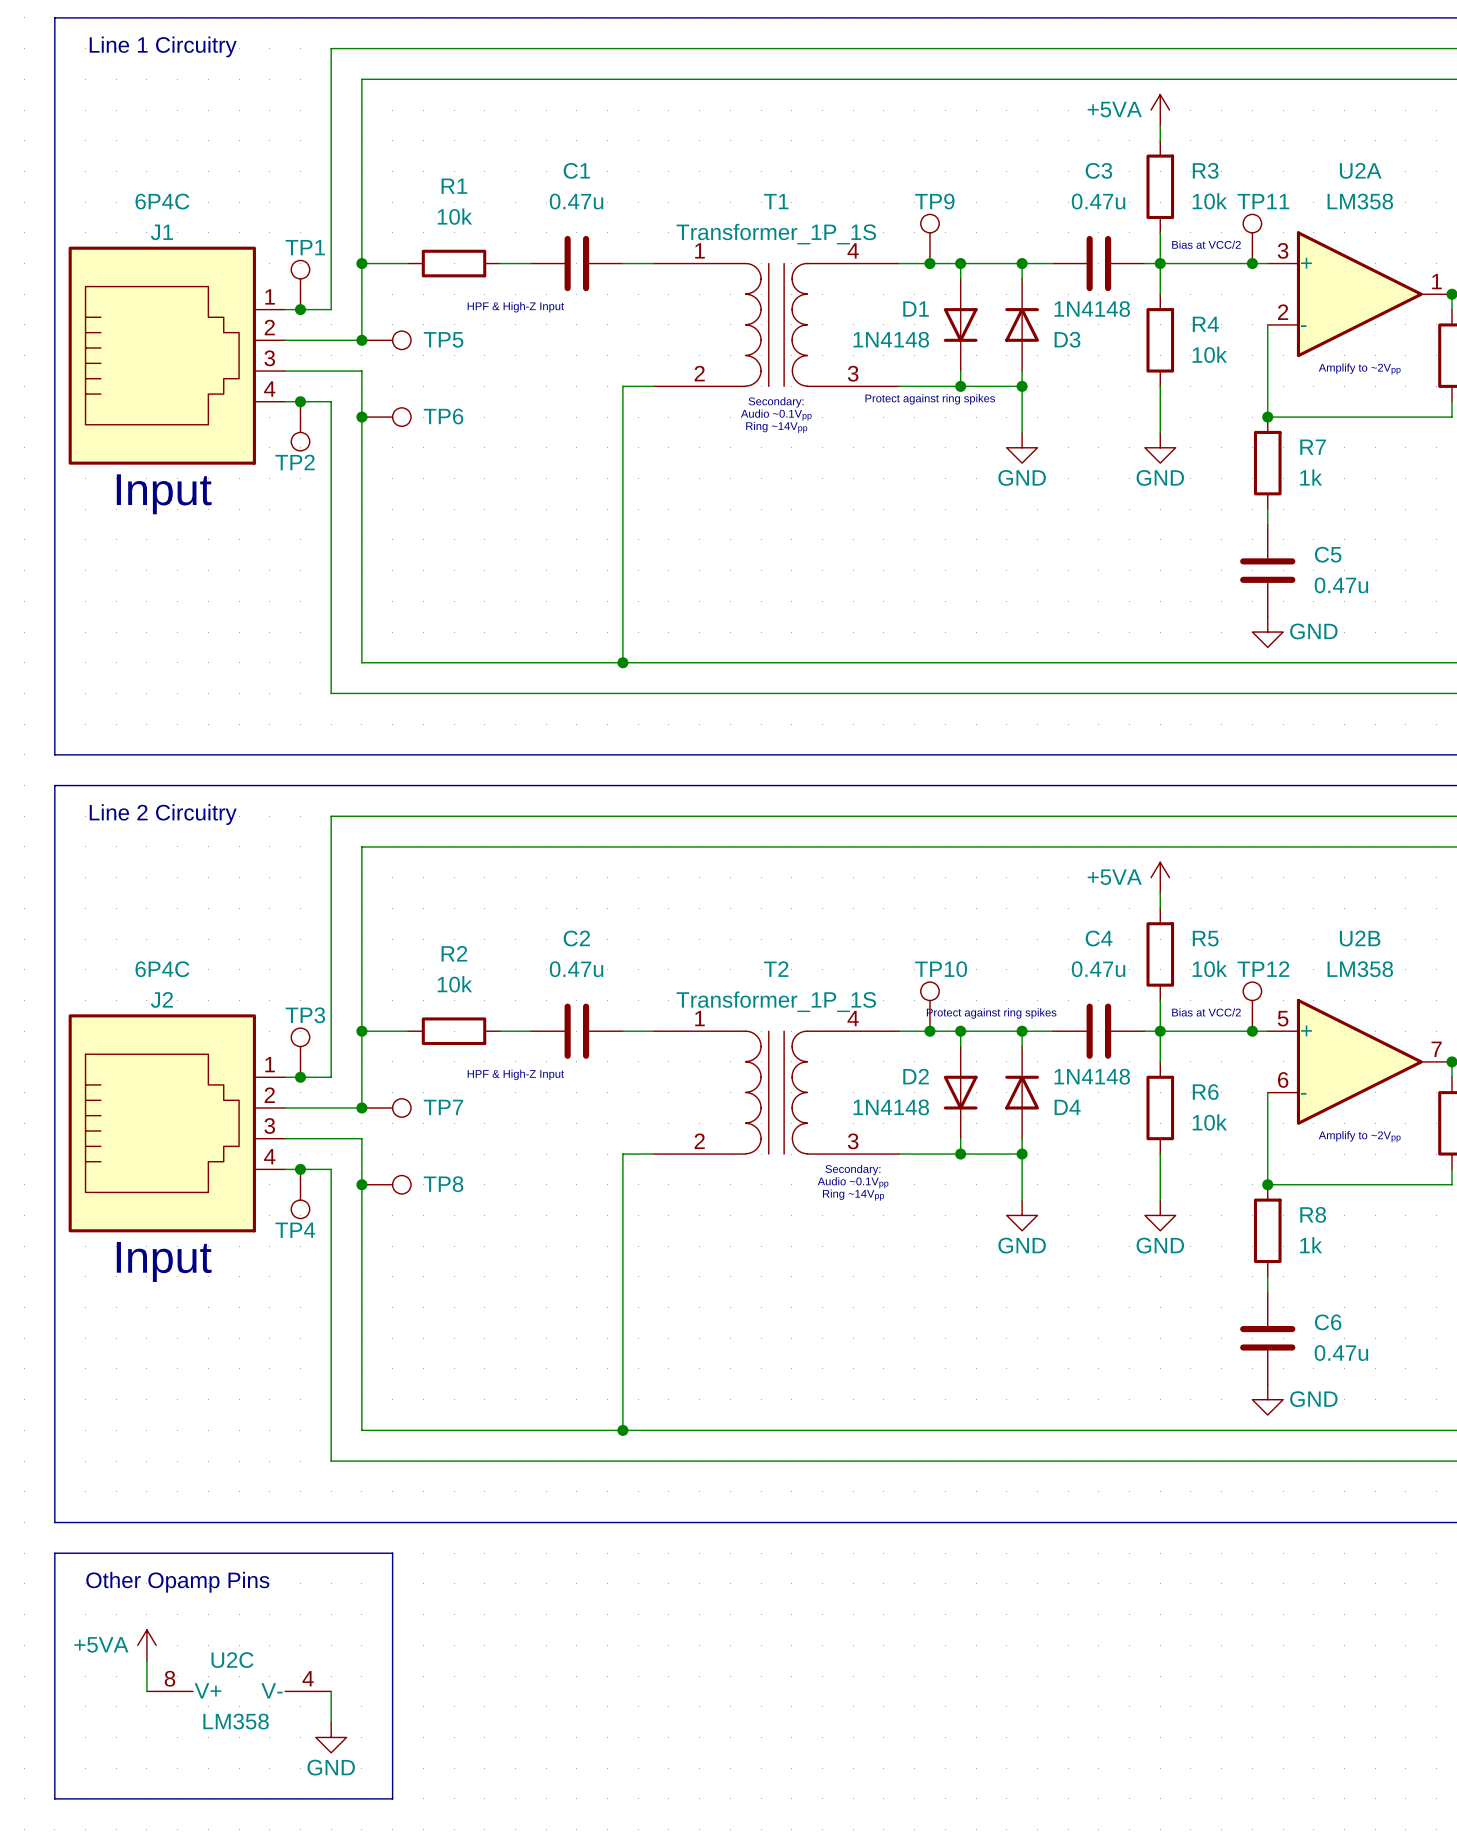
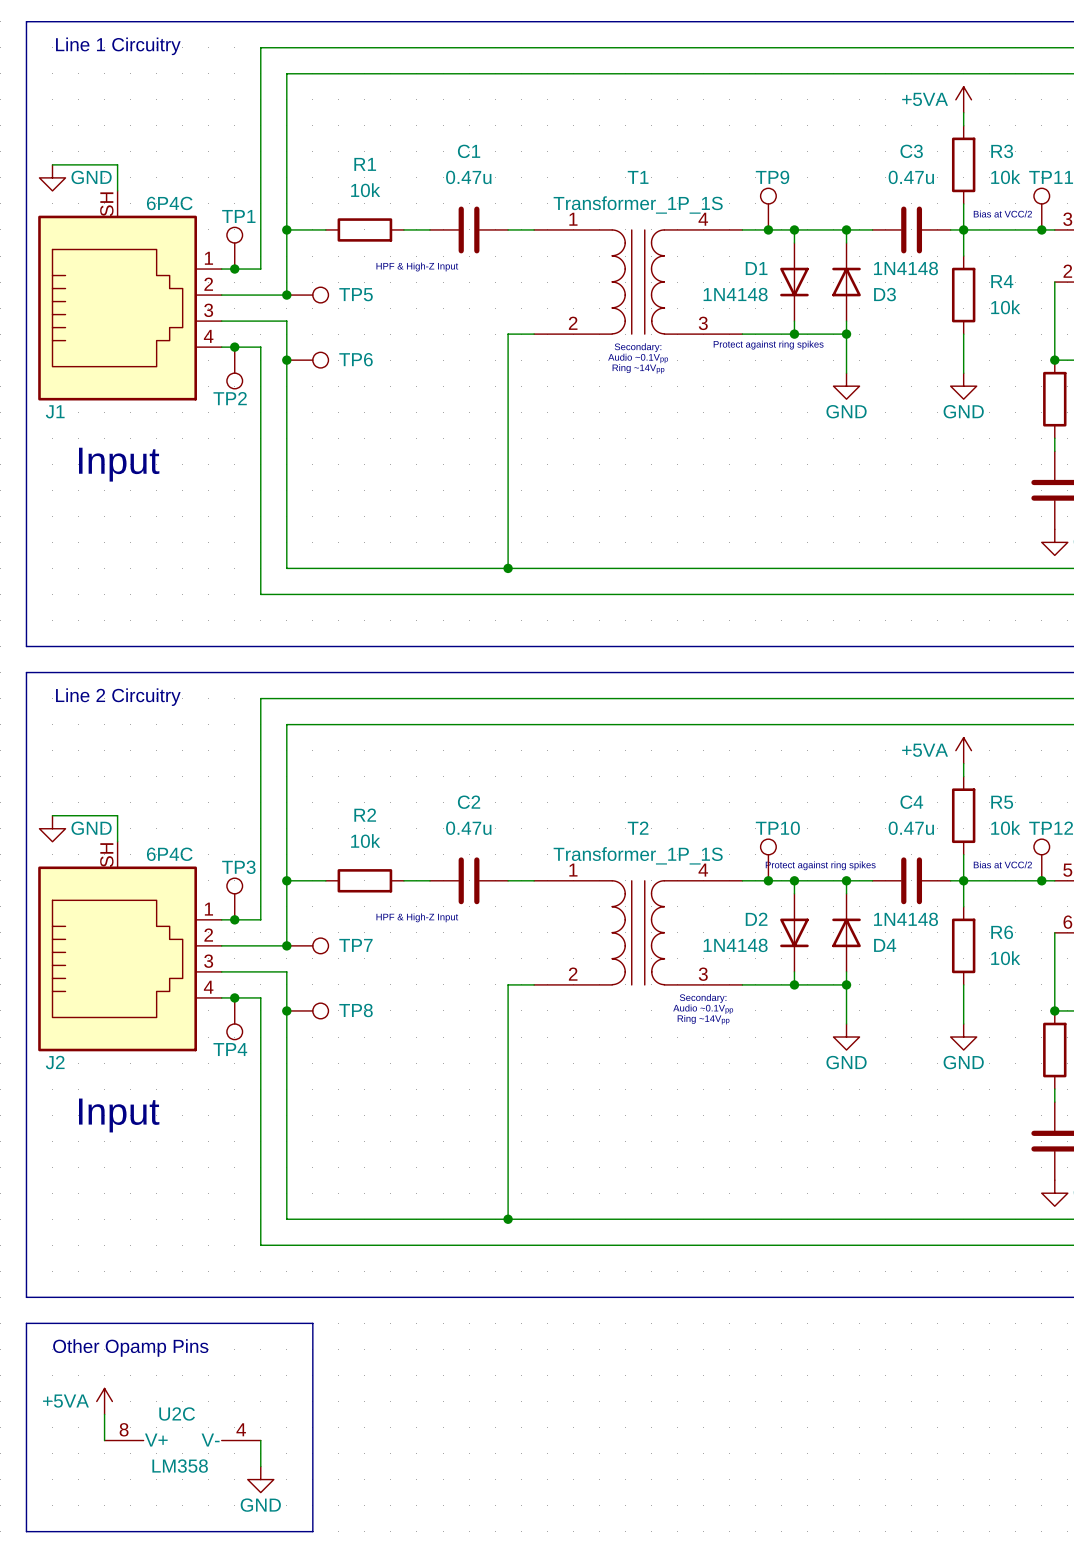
wire: none -> (52, 164) (117, 164) (117, 190)
J1 value position: 6P4C (162, 201) -> 6P4C (169, 203)
power symbol: none -> GND (52, 177)
J1 name position: J1 (161, 232) -> J1 (55, 411)
J1 symbol: [68, 246, 286, 465] -> [38, 190, 222, 401]
text position: Input (164, 494) -> Input (119, 464)
wire: none -> (52, 815) (117, 815) (117, 841)
power symbol: none -> GND (52, 828)
J2 value position: 6P4C (162, 969) -> 6P4C (169, 854)
J2 name position: J2 (161, 999) -> J2 (55, 1062)
J2 symbol: [68, 1014, 286, 1233] -> [38, 841, 222, 1052]
text position: Input (164, 1261) -> Input (119, 1115)

